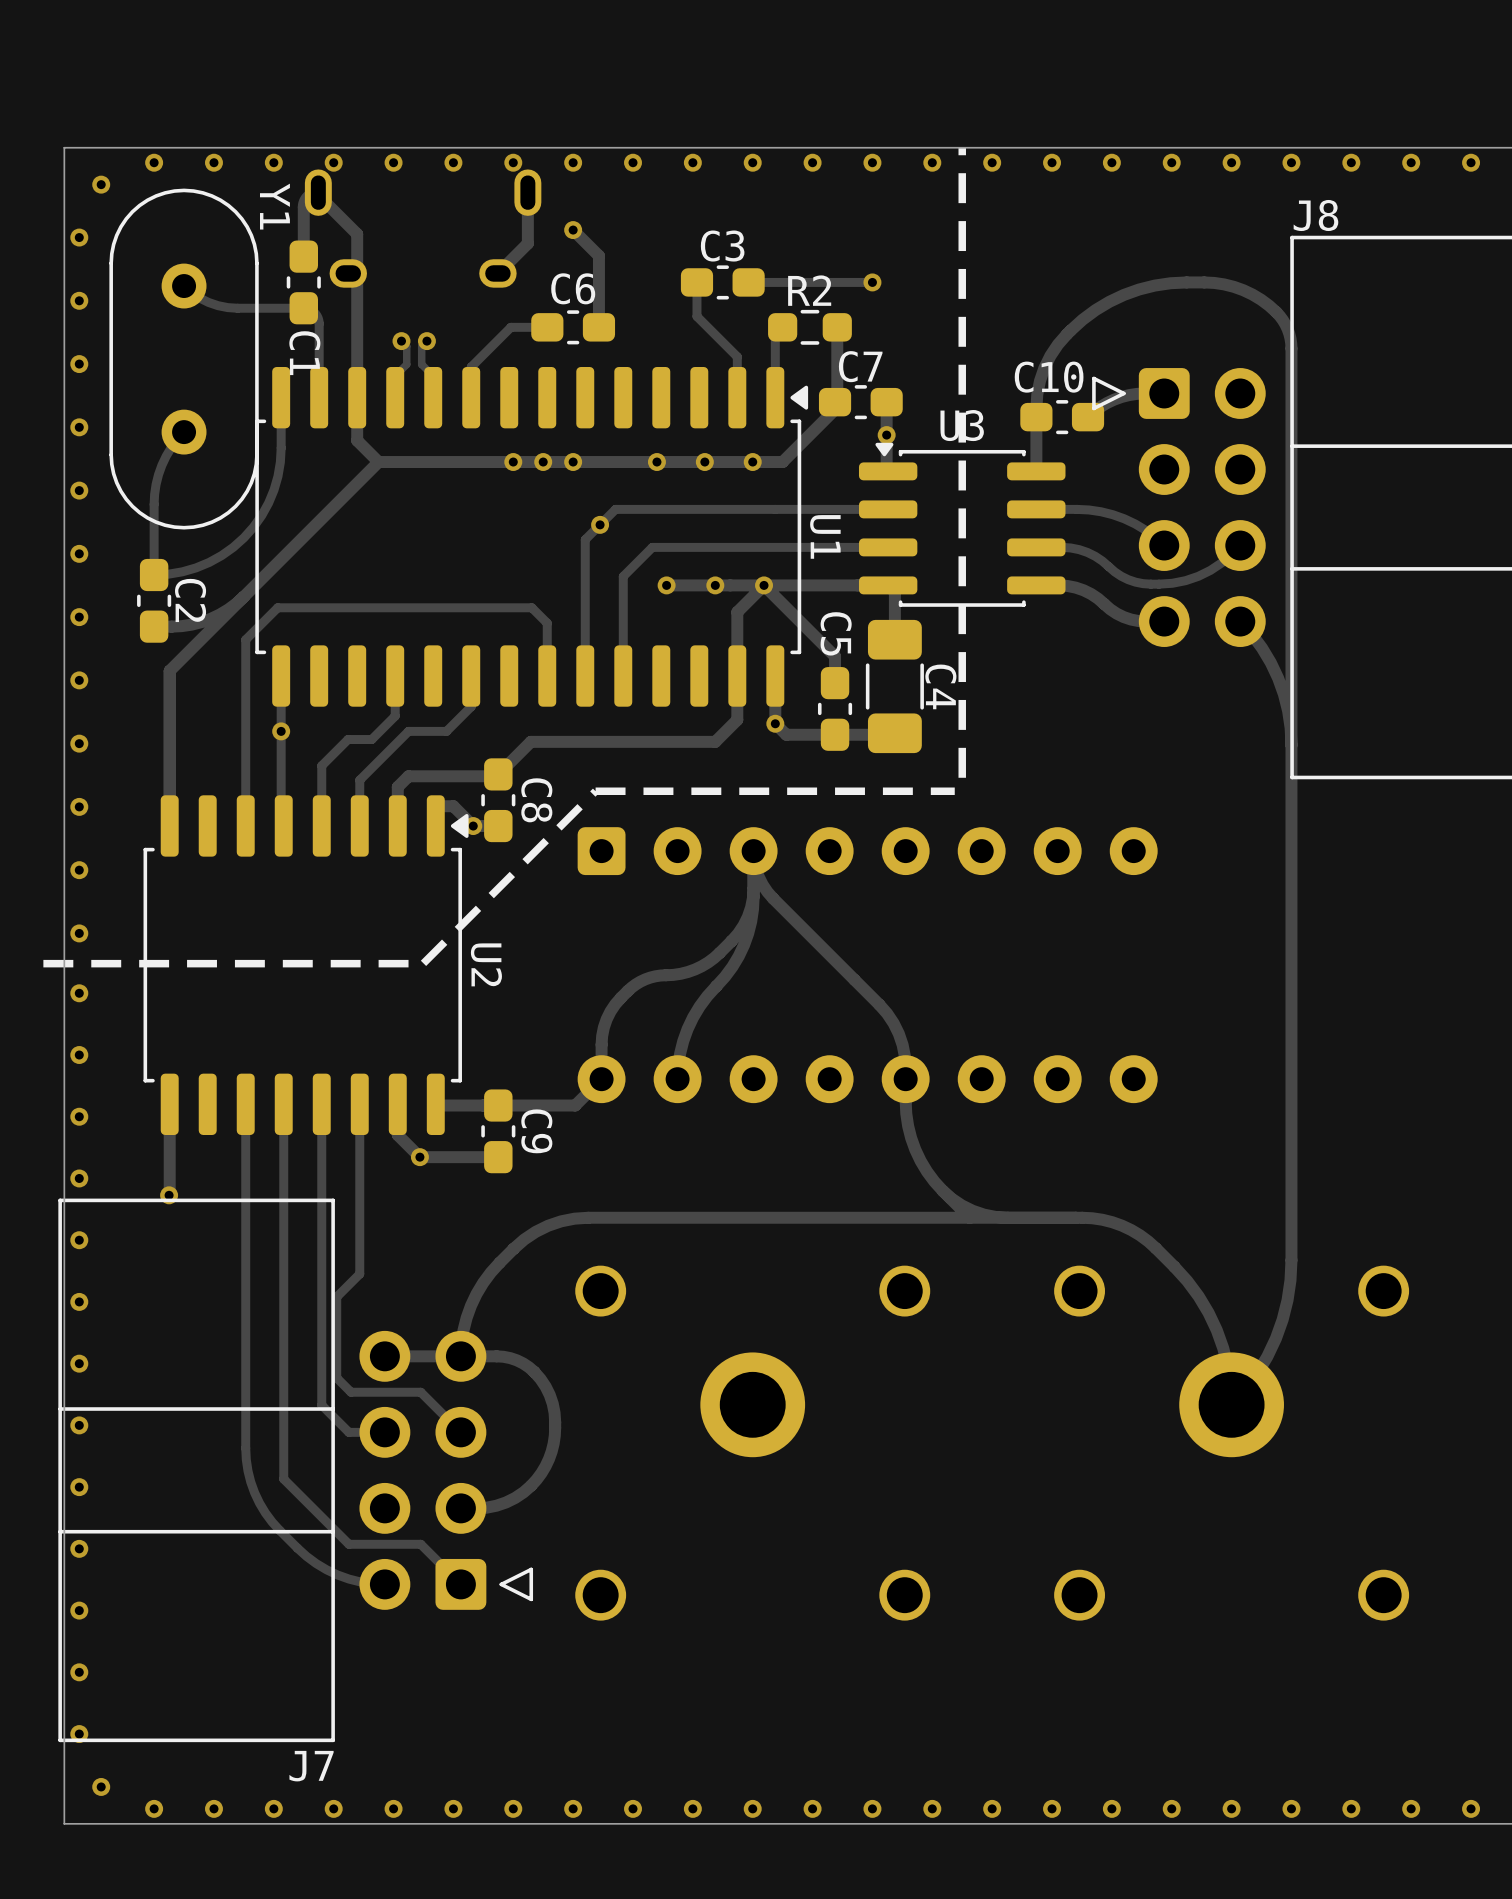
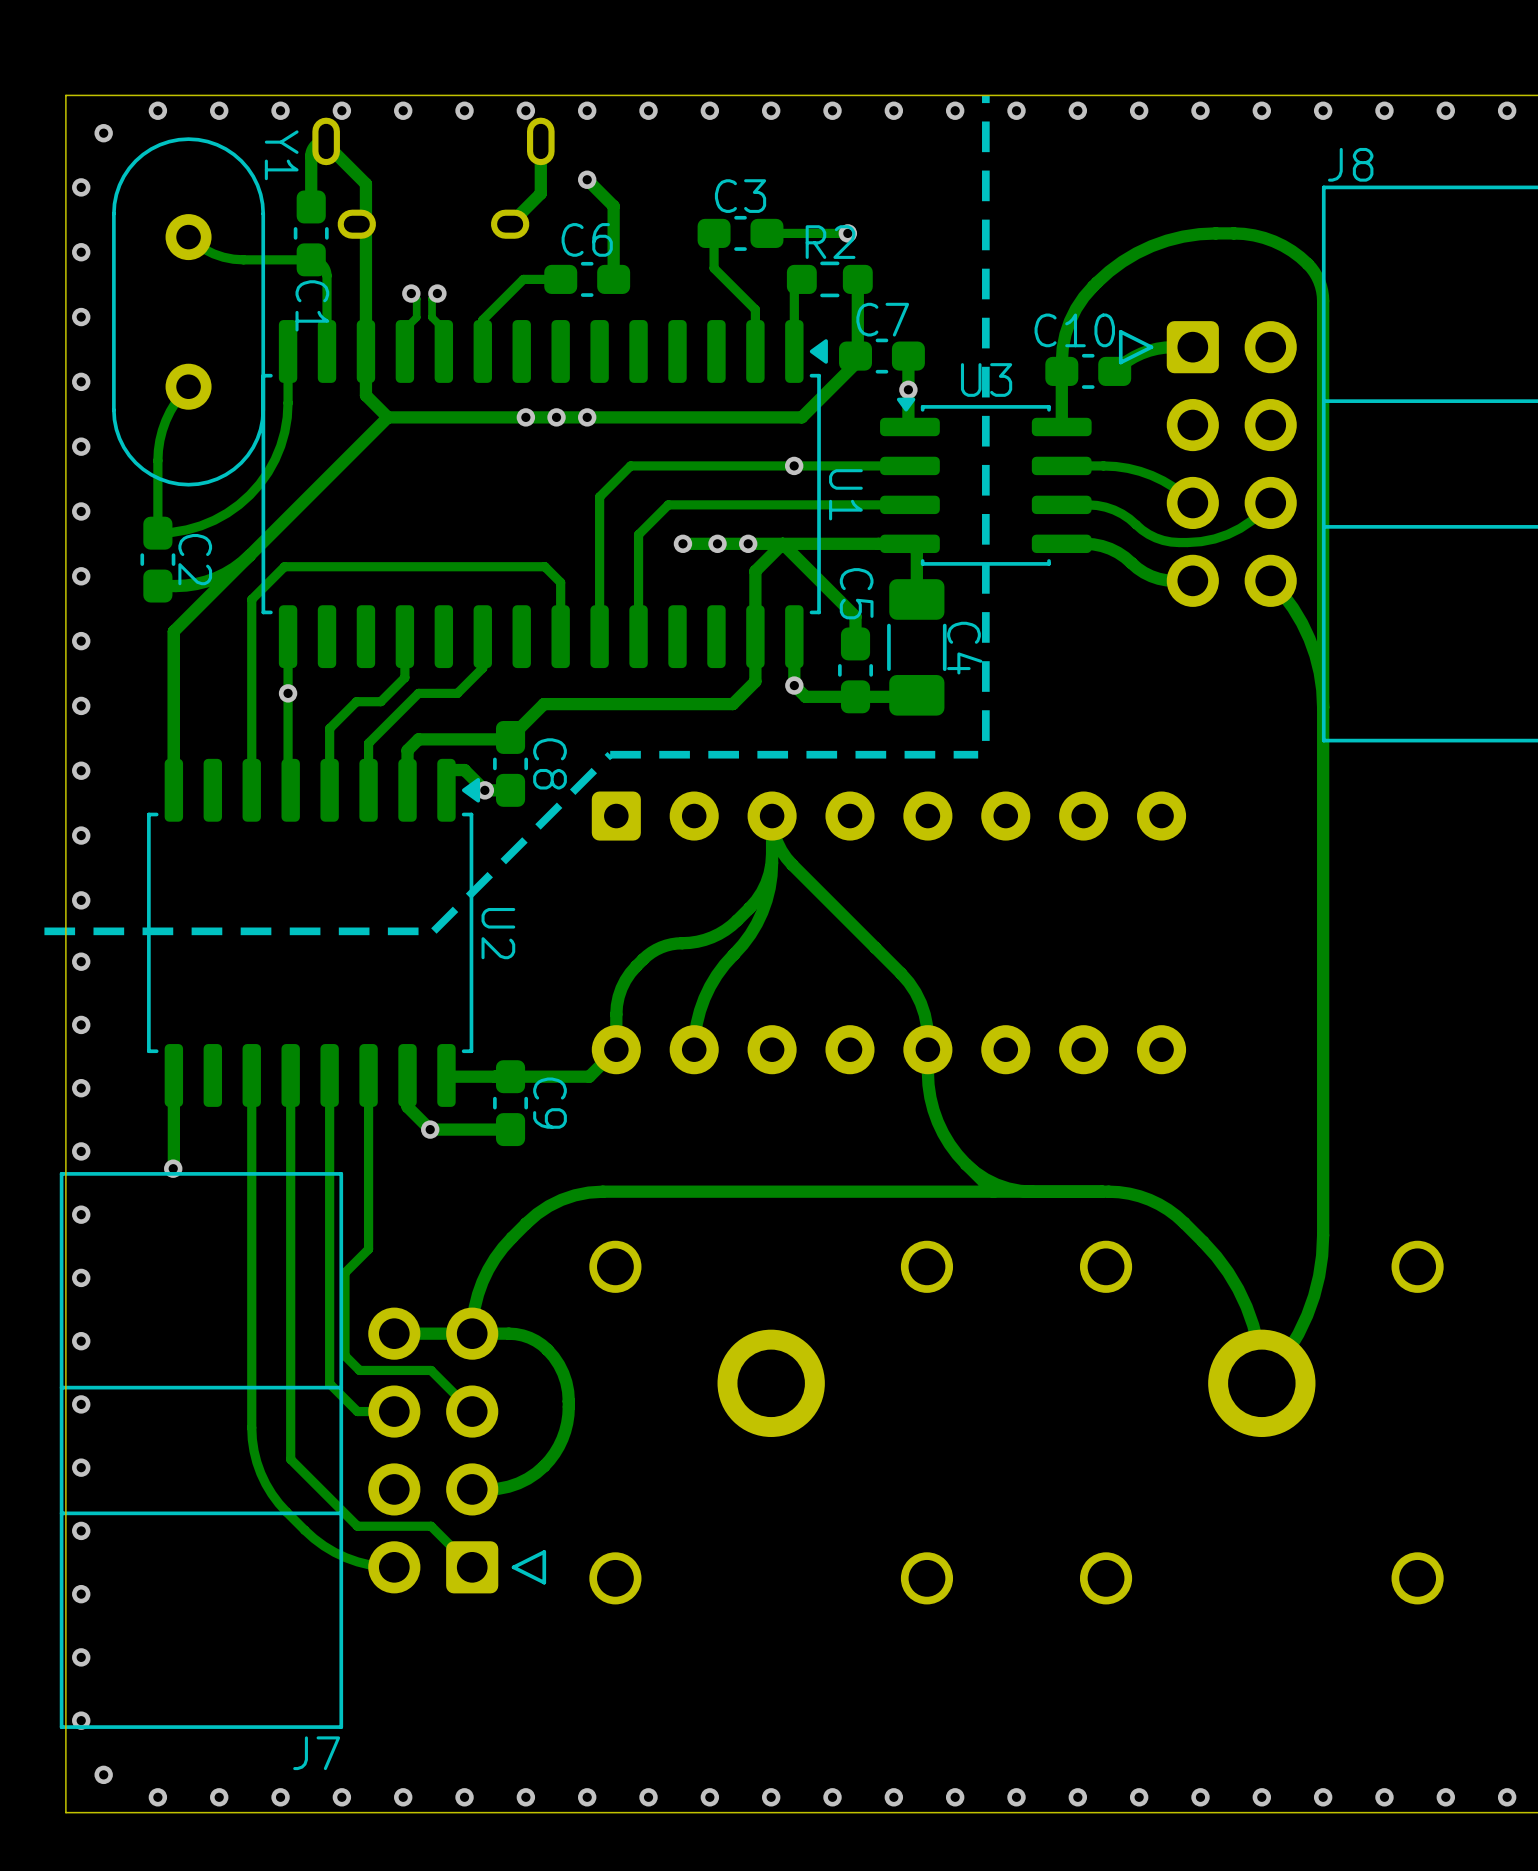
track: (872, 282) (827, 282) -> none
via position: (872, 282) -> (847, 233)
via: (656, 462) -> none
via: (704, 462) -> none
via: (752, 462) -> none
via: none -> (794, 465)
via: (600, 524) -> none
via: none -> (717, 543)
via: (715, 585) -> none
via: none -> (748, 543)
via: (764, 585) -> none

